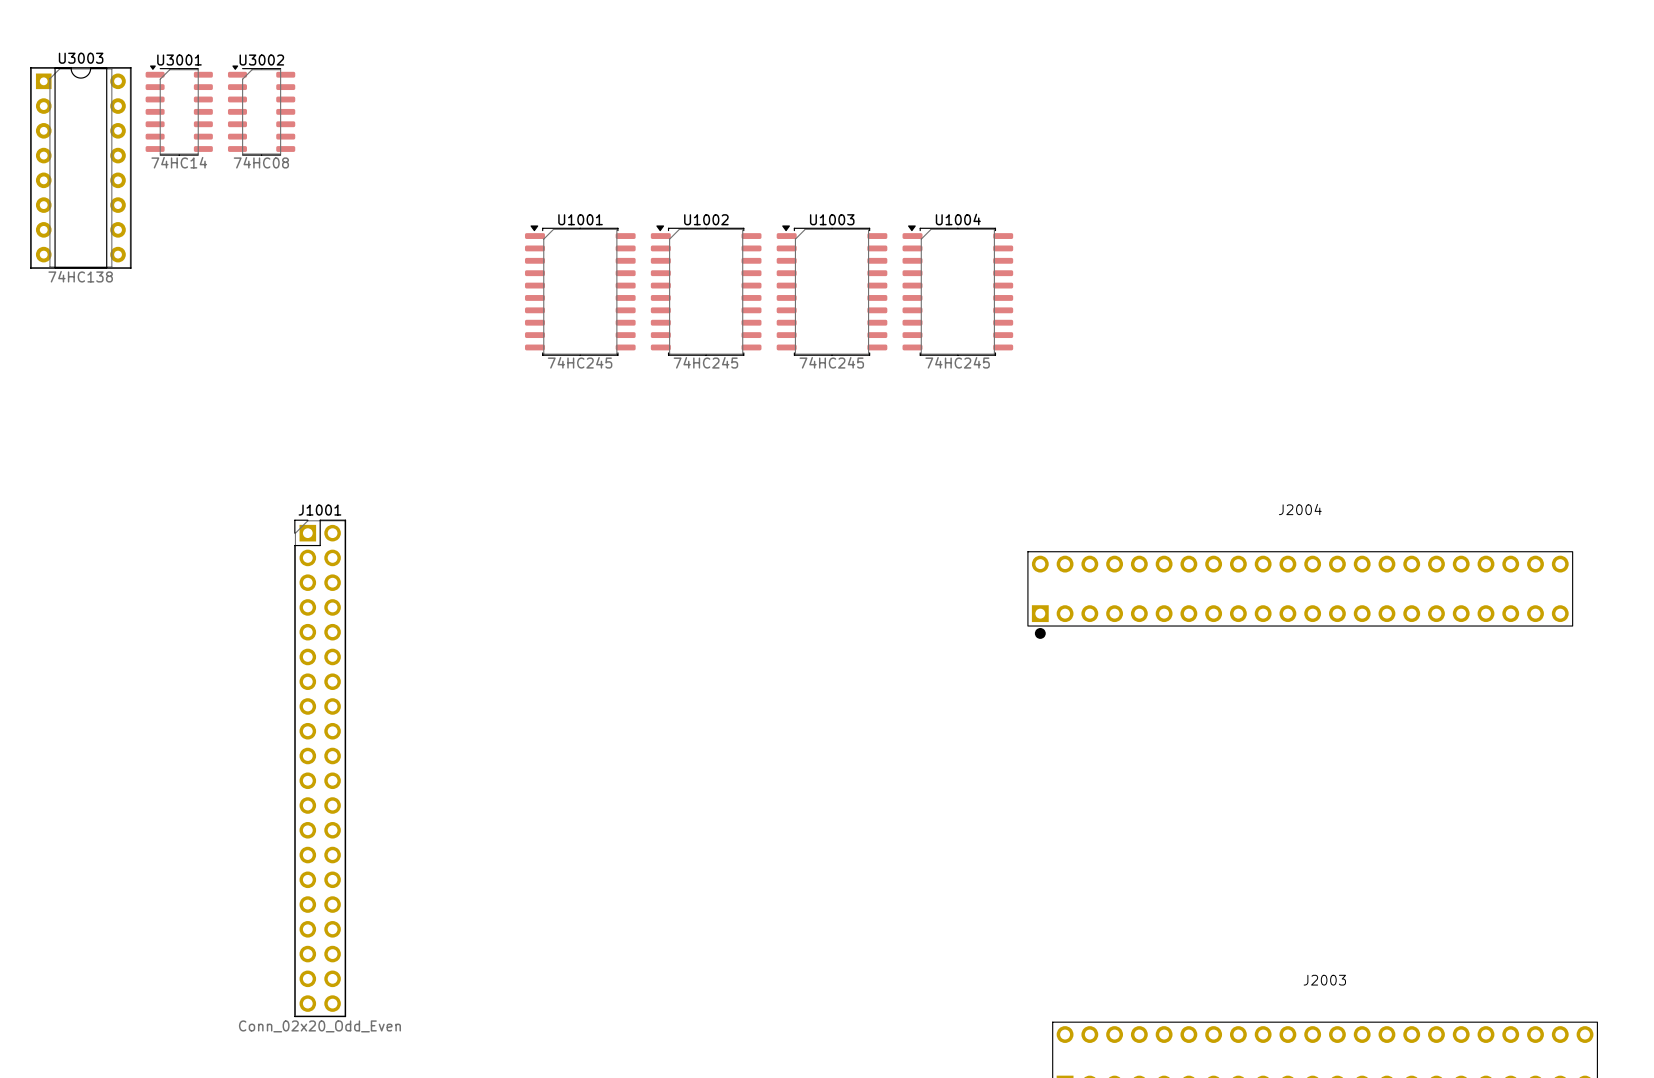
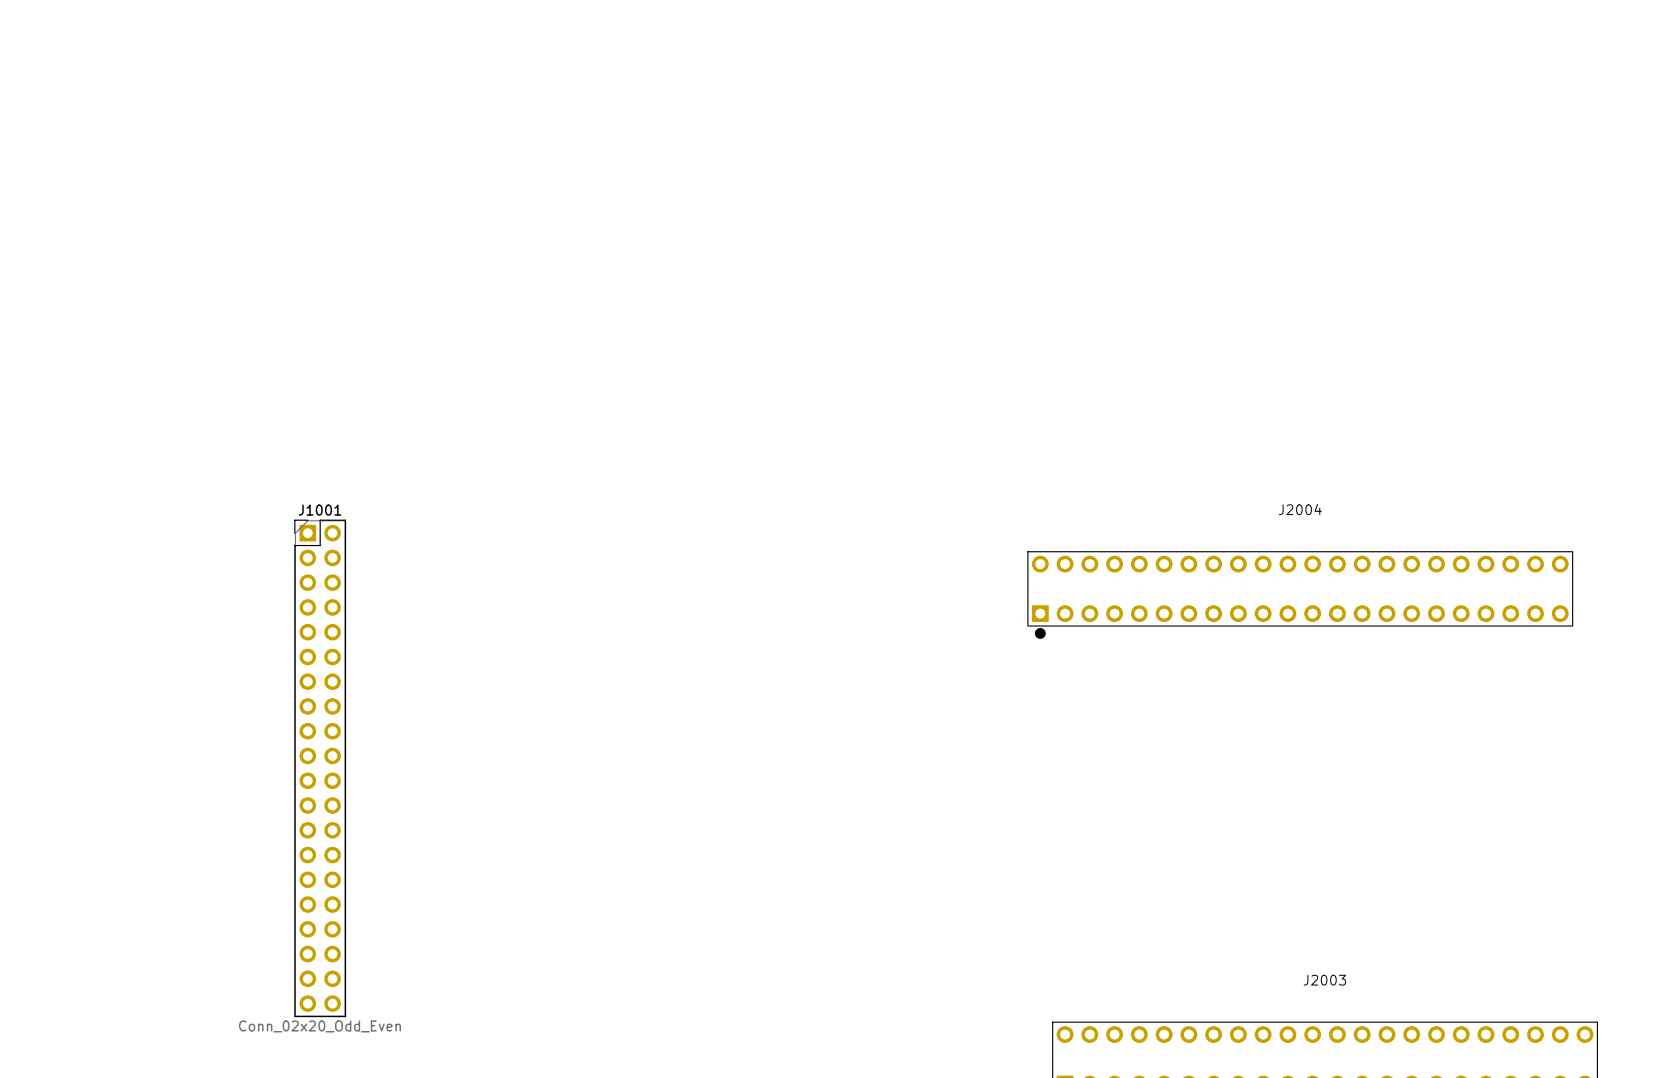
U3001: 74HC14 (179, 110) -> none
U3002: 74HC08 (261, 110) -> none
U3003: 74HC138 (80, 167) -> none
U1001: 74HC245 (580, 290) -> none
U1002: 74HC245 (706, 290) -> none
U1003: 74HC245 (832, 290) -> none
U1004: 74HC245 (957, 290) -> none

